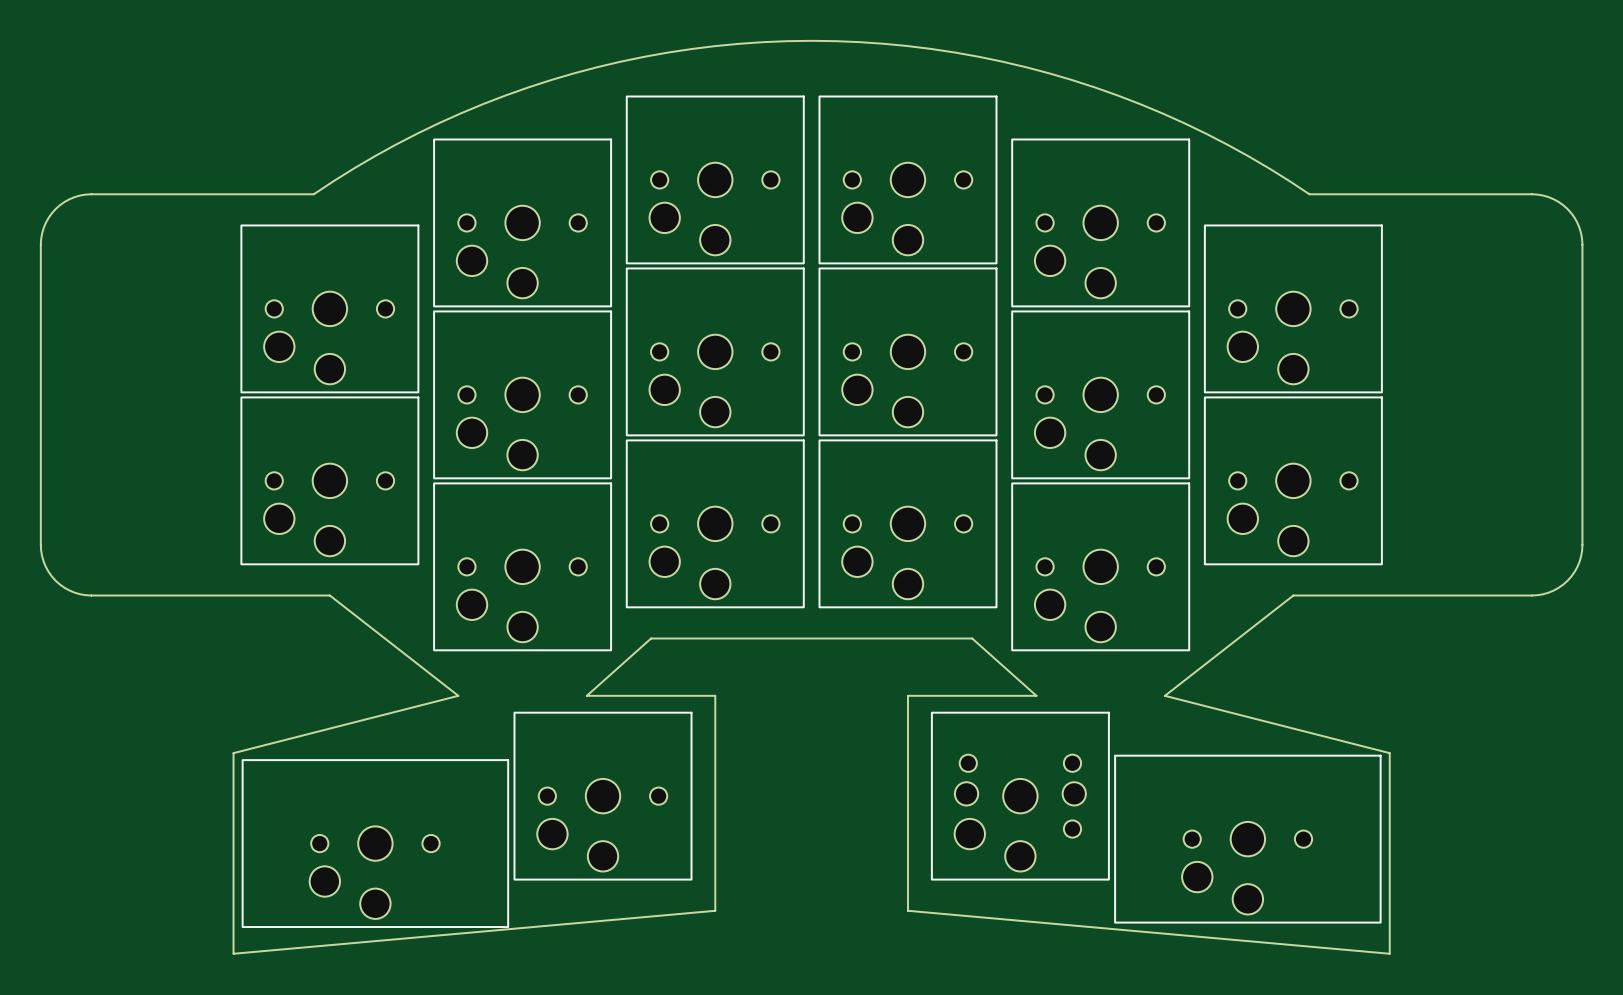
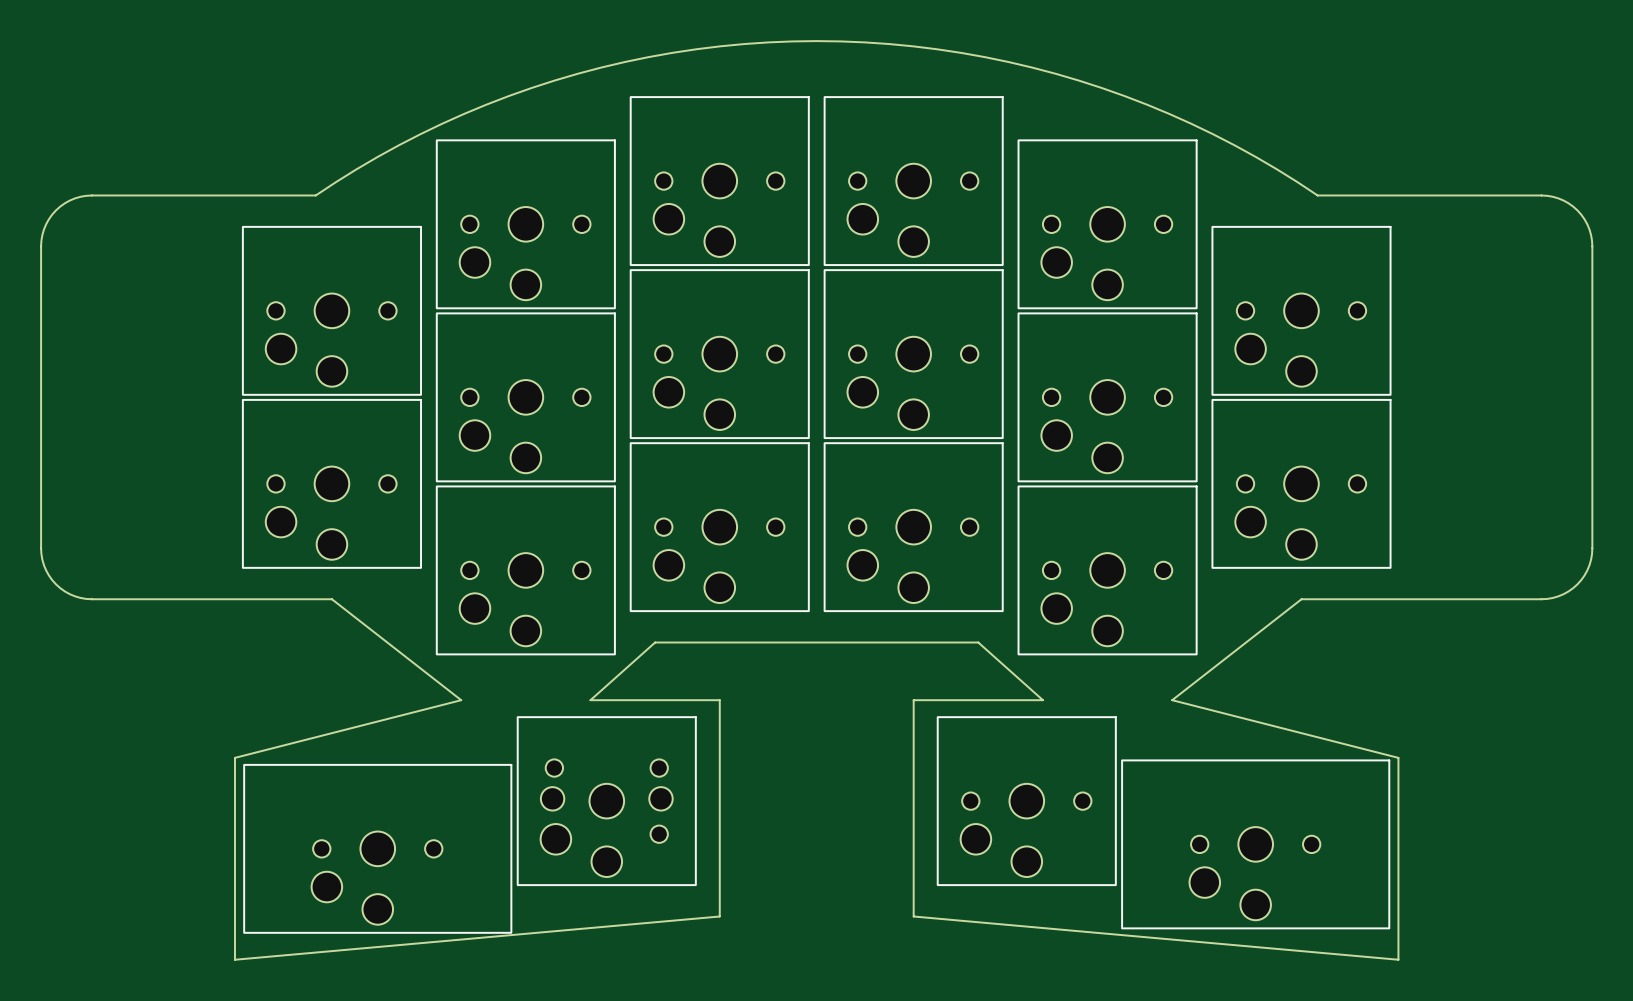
part footprint: [513, 712, 693, 881] -> [517, 716, 697, 886]
part footprint: [931, 712, 1110, 881] -> [937, 716, 1117, 886]

